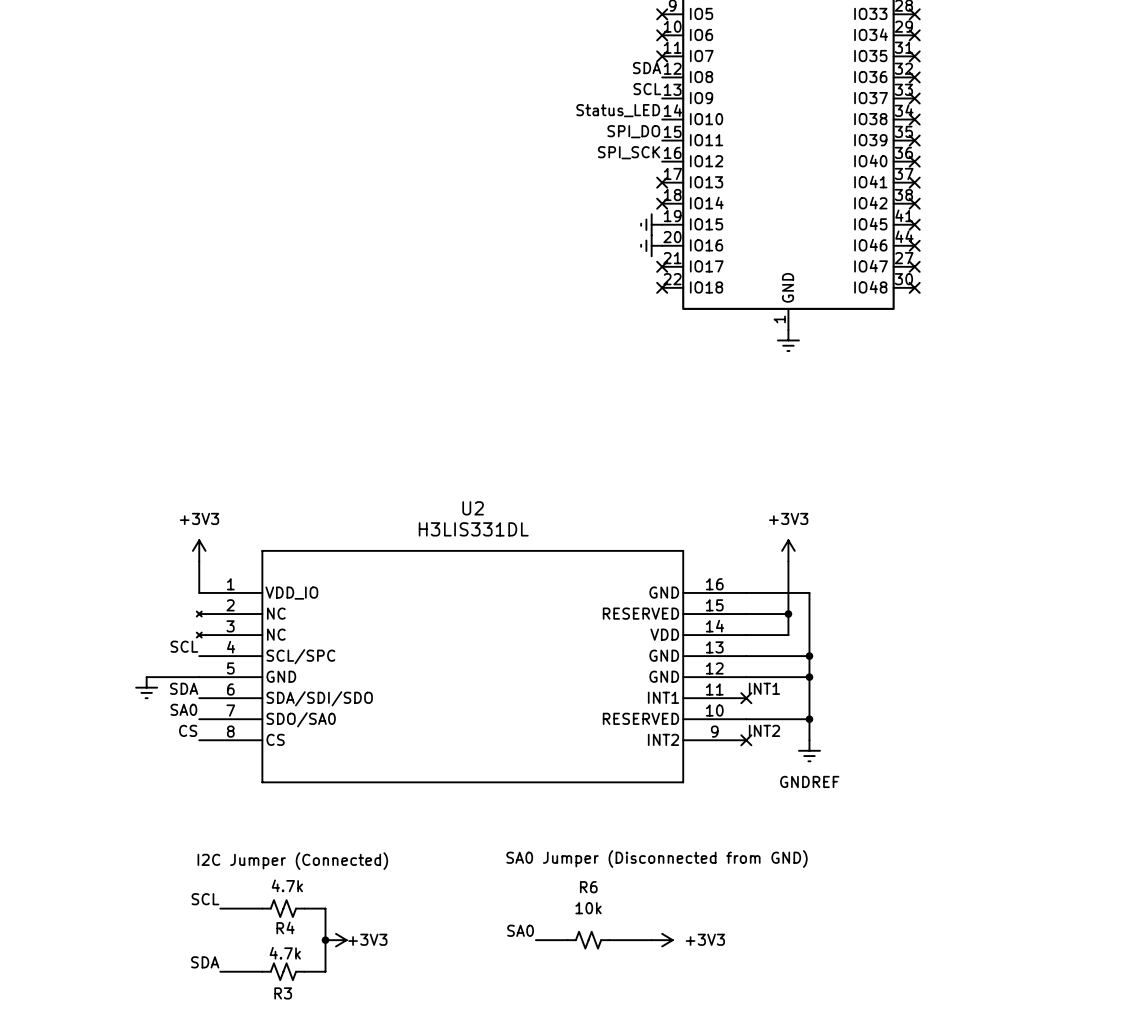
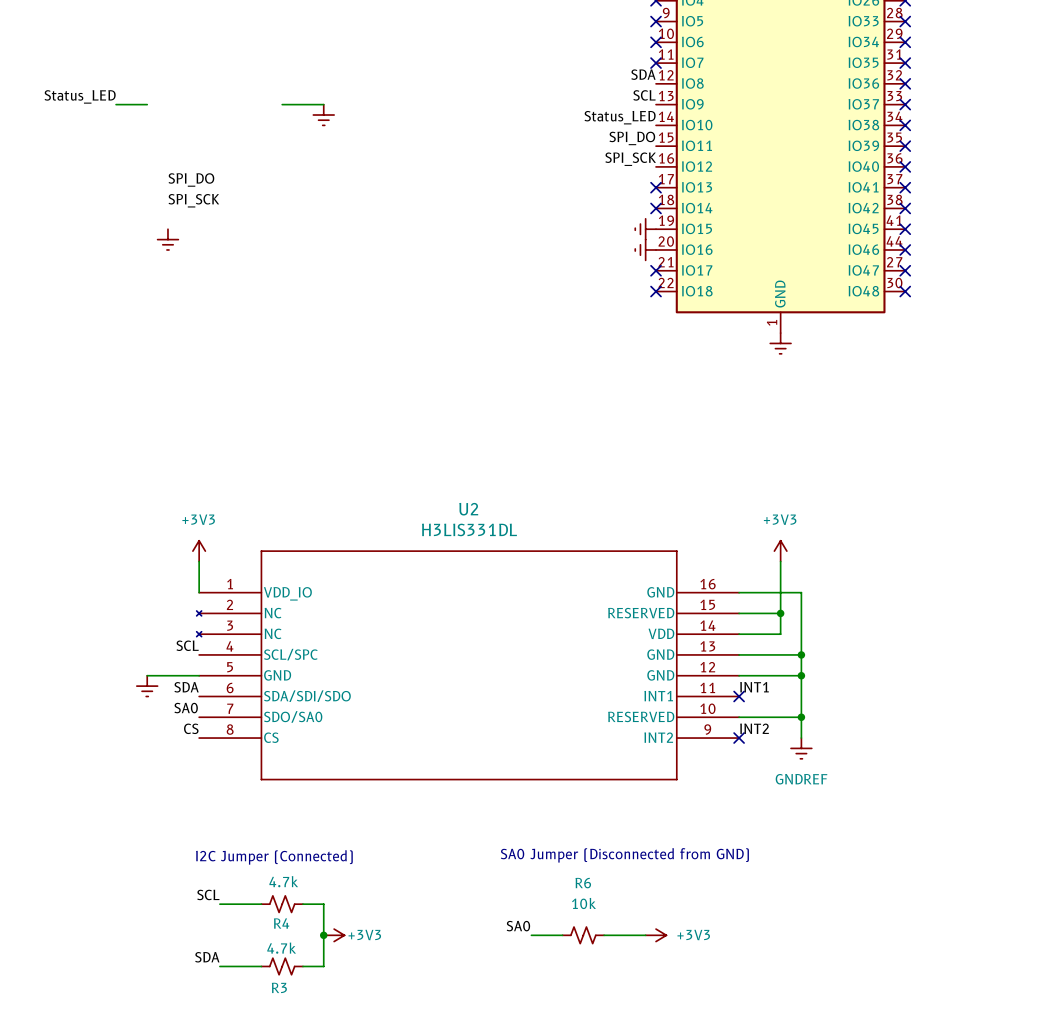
label: none -> Status_LED (80, 96)
wire: none -> (116, 104) (147, 104)
wire: none -> (282, 104) (323, 104)
power symbol: none -> (323, 115)
label: none -> SPI_DO (191, 179)
label: none -> SPI_SCK (193, 200)
power symbol: none -> (167, 239)

